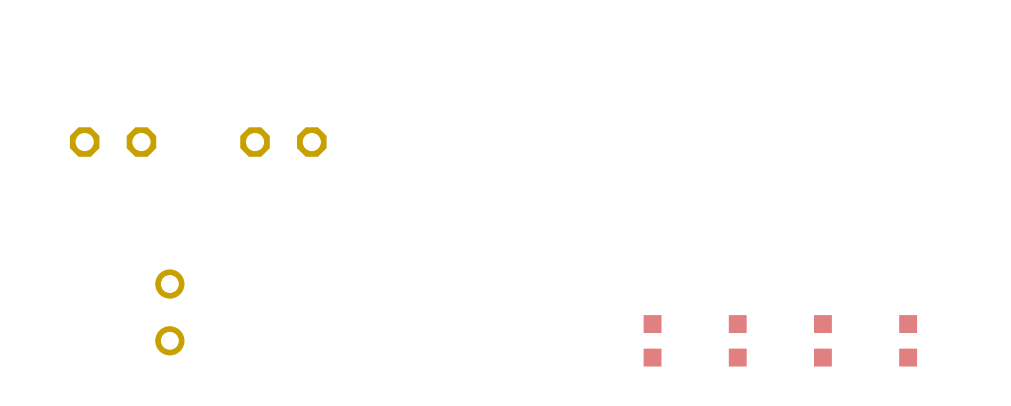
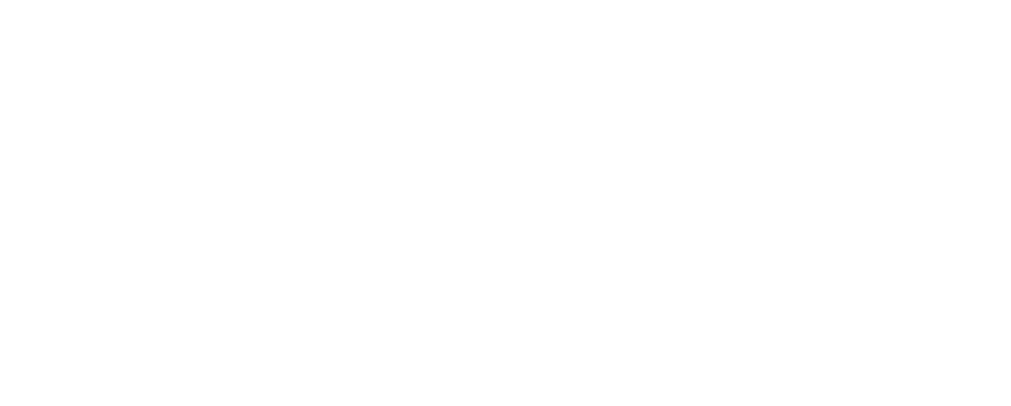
part: (113, 142) -> none
part: (283, 142) -> none
part: (169, 312) -> none
part: (652, 340) -> none
part: (737, 340) -> none
part: (822, 340) -> none
part: (908, 340) -> none

